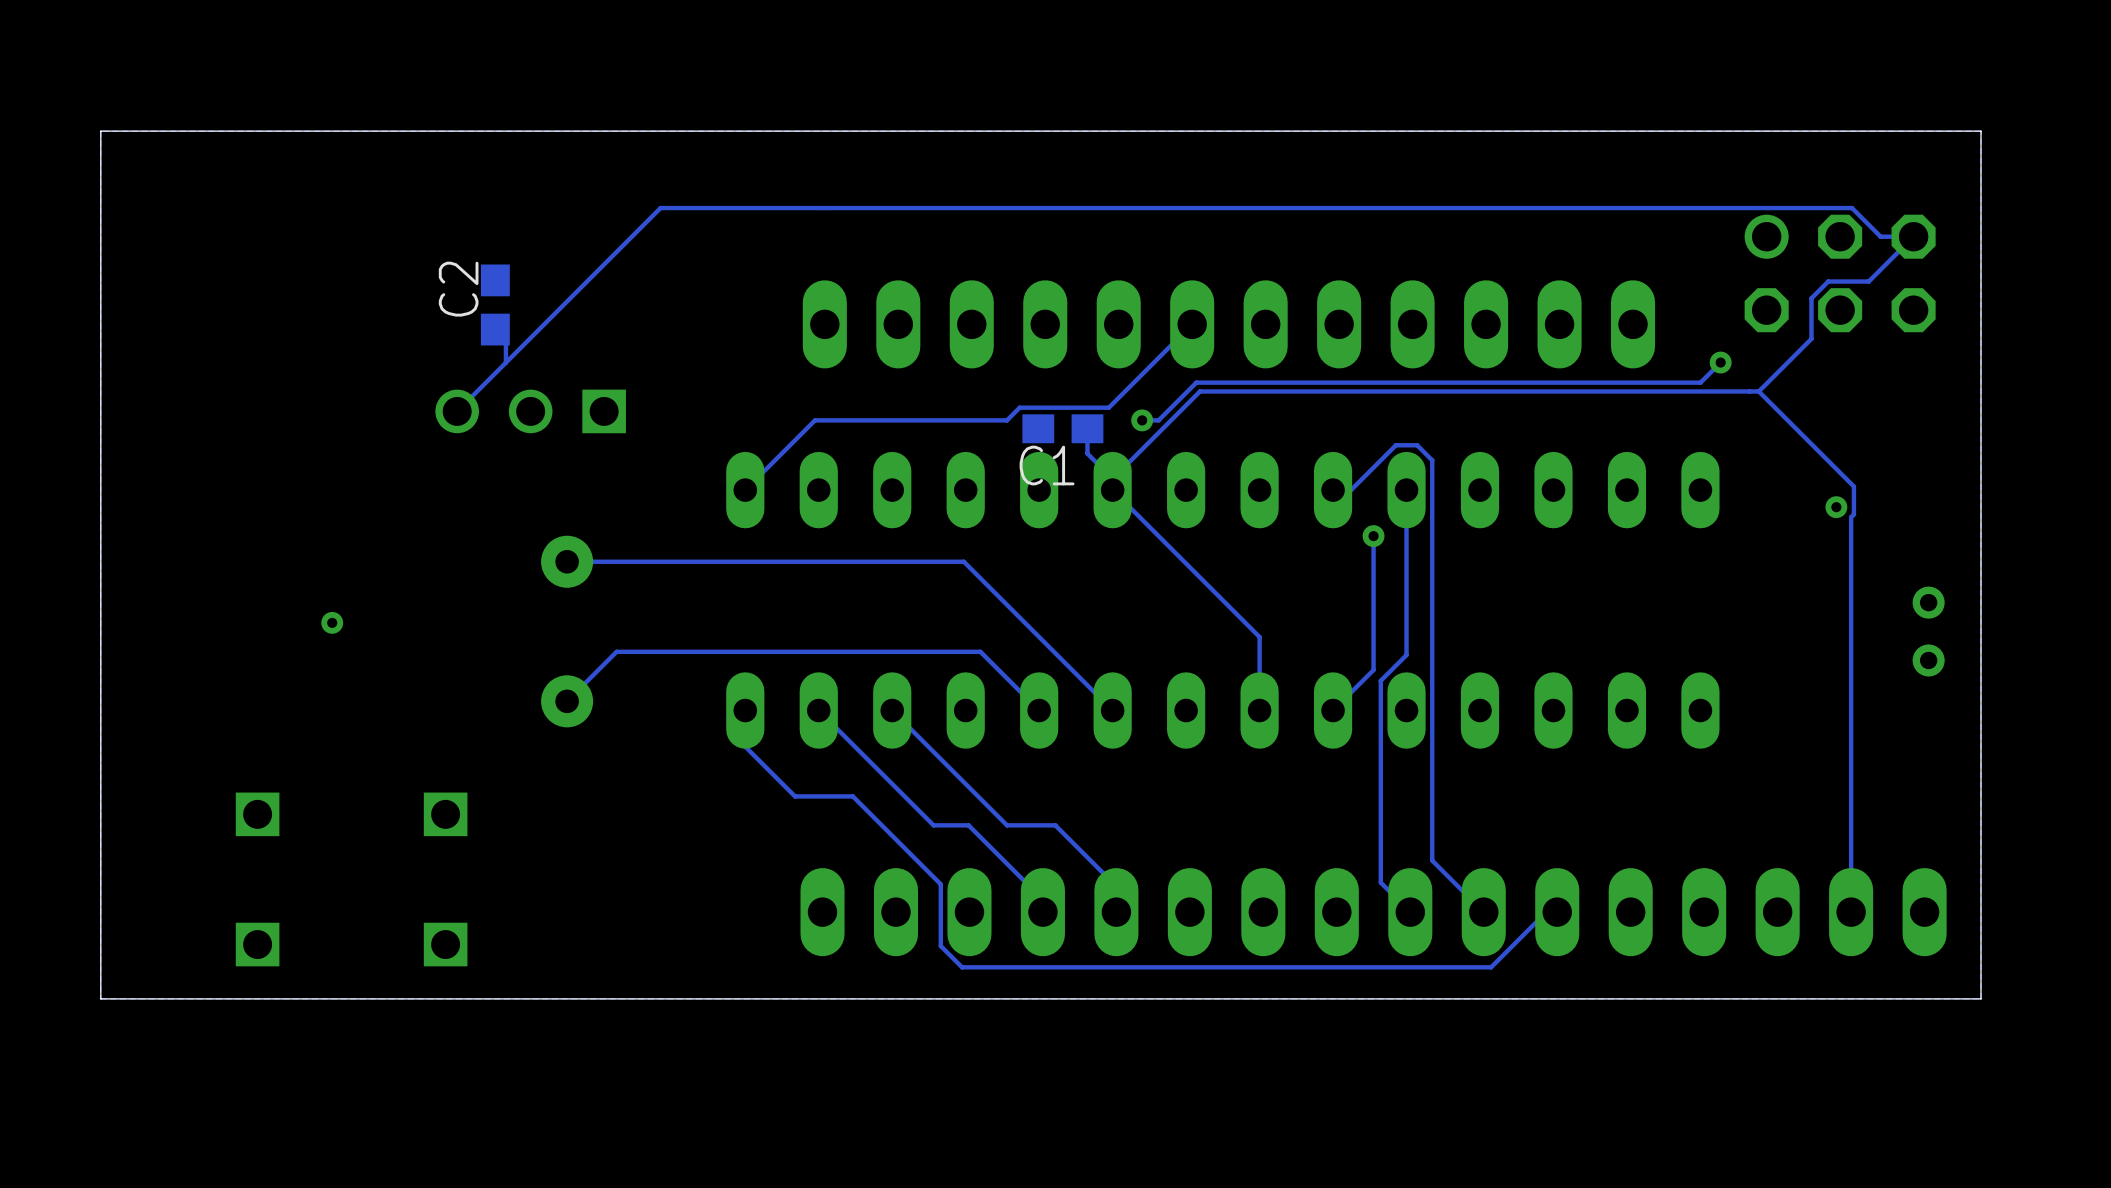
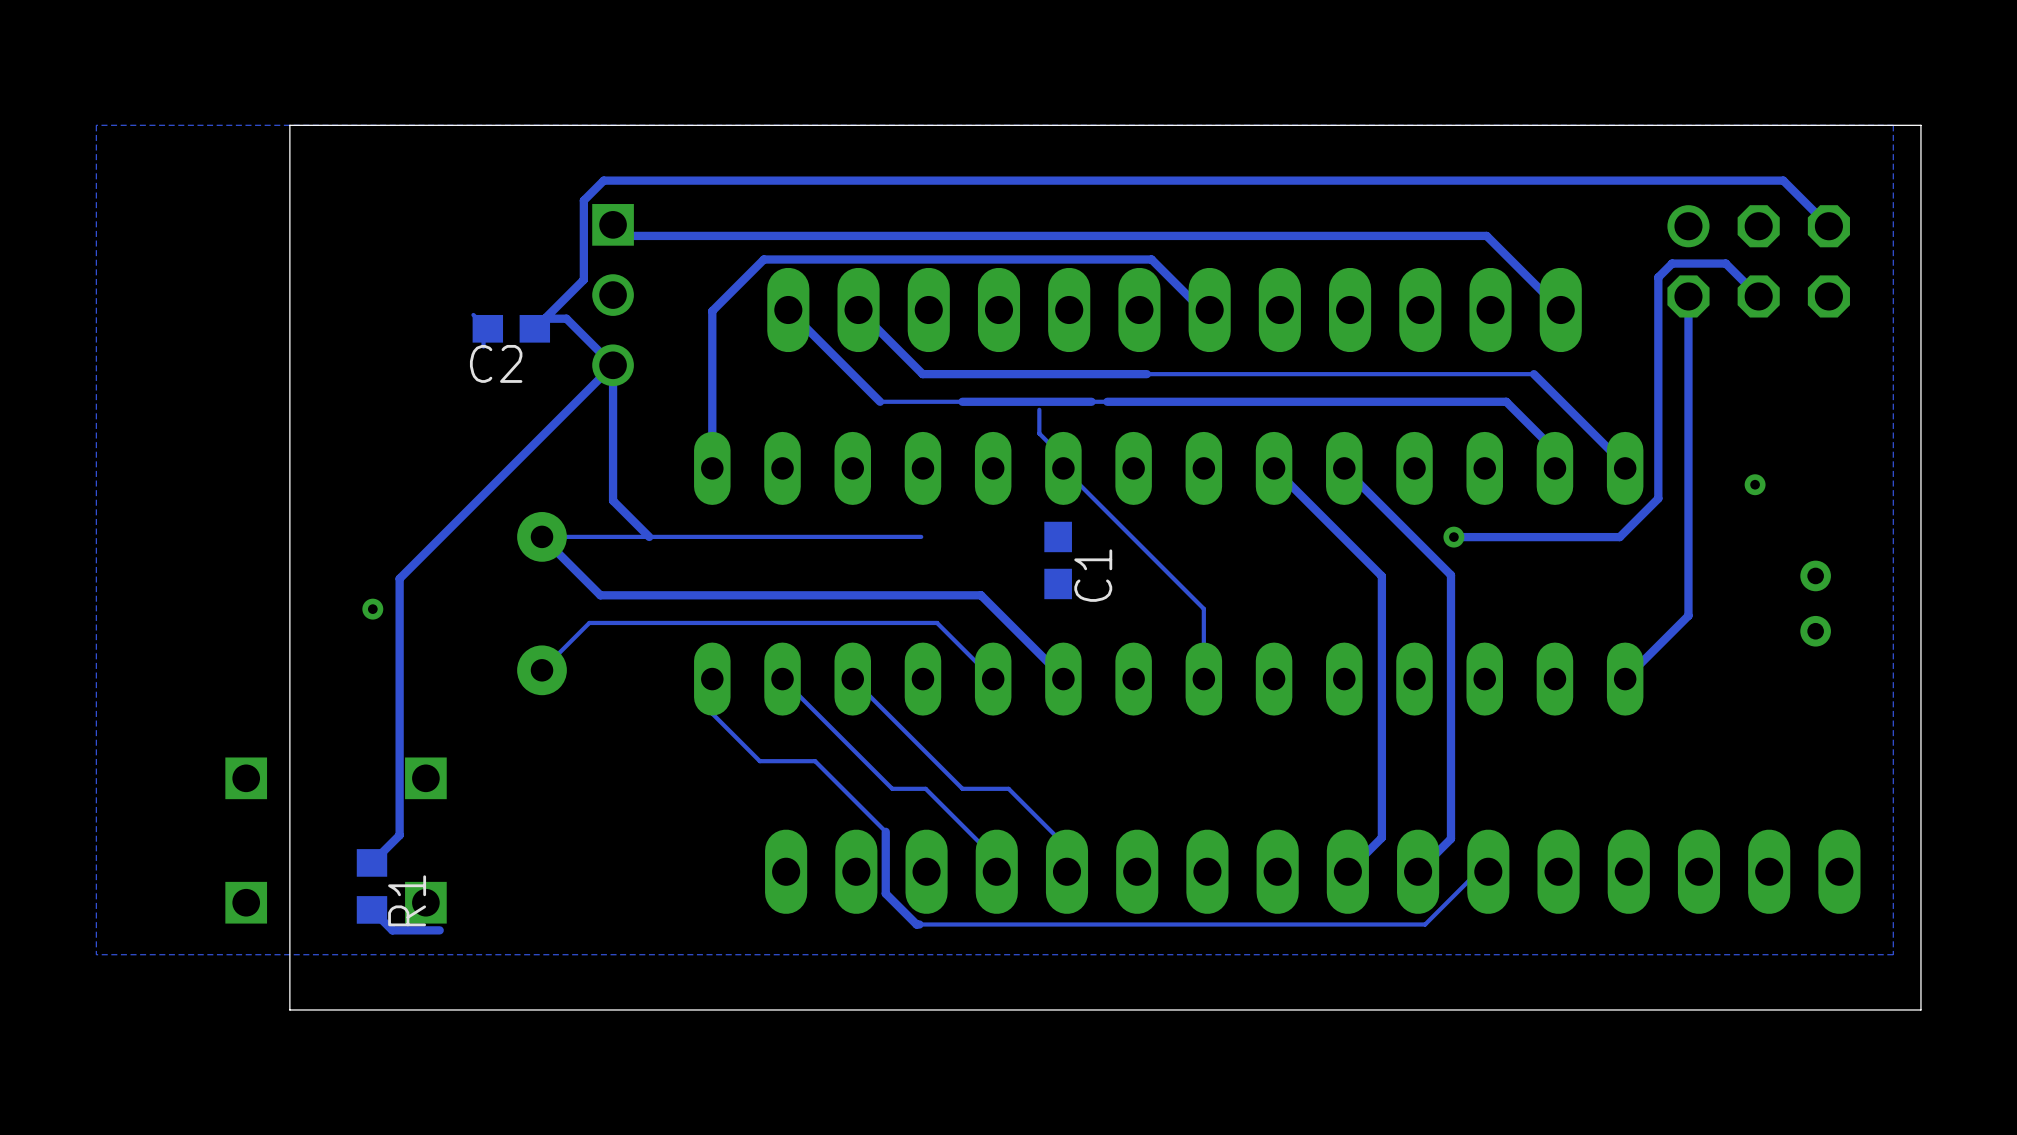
board edge: (1981, 131) (1981, 998) (100, 998) (100, 131) (303, 131) -> (1893, 125) (1920, 125) (1920, 1009) (289, 1009) (289, 125)
track: none -> (613, 224) (624, 235) (1486, 235) (1560, 310)
track: none -> (1828, 226) (1783, 180) (603, 180) (583, 200) (583, 279) (534, 328)
C2 name position: C2 (458, 289) -> C2 (496, 363)
C2 rotation: 0° (495, 304) -> 90° clockwise (511, 328)
C2 position: (495, 304) -> (511, 328)
track: none -> (1688, 296) (1688, 615) (1625, 679)
track: none -> (1758, 296) (1725, 263) (1672, 263) (1658, 277) (1658, 498) (1619, 537) (1453, 537)
track: (1192, 324) (1108, 407) (1019, 407) (1006, 420) -> (1091, 401) (962, 401)
track: none -> (1209, 310) (1202, 310) (1151, 259) (763, 259) (712, 311) (712, 468)
track: none -> (544, 318) (566, 318) (613, 365)
track: (1720, 362) (1700, 382) (1196, 382) (1158, 420) -> (1554, 468) (1554, 450) (1506, 401) (1107, 401)
via: (1720, 362) -> none
track: none -> (613, 365) (613, 500) (649, 536)
track: none -> (613, 365) (399, 578) (399, 835) (371, 862)
track: (1200, 391) (1112, 478) -> (1146, 374) (922, 374) (858, 310)
track: (1758, 391) (1604, 391) -> (1625, 468) (1625, 465) (1533, 374)
track: (1758, 391) (1811, 338) (1811, 298) (1828, 281) (1868, 281) (1913, 236) (1880, 236) (1852, 208) (660, 208) (457, 411) -> none
track: (1758, 391) (1853, 486) (1853, 514) (1851, 517) (1851, 912) -> none
part rotation: 0° (530, 411) -> 90° counterclockwise (613, 295)
part position: (530, 411) -> (613, 295)
track: (920, 420) (815, 420) (745, 490) -> (880, 401) (788, 310)
via: (1142, 420) -> none
C1 rotation: 0° (1062, 428) -> 90° clockwise (1058, 560)
C1 position: (1062, 428) -> (1058, 560)
C1 name position: C1 (1047, 465) -> C1 (1093, 575)
track: (1333, 490) (1351, 490) (1395, 445) (1417, 445) (1432, 460) (1432, 860) (1483, 912) -> (1274, 468) (1381, 576) (1381, 837) (1347, 871)
track: (1406, 490) (1406, 655) (1380, 680) (1380, 882) (1410, 912) -> (1344, 468) (1450, 575) (1450, 838) (1418, 871)
track: (1373, 536) (1373, 670) (1333, 710) -> none
via: (1373, 536) -> none
track: (963, 561) (1112, 710) -> (542, 536) (600, 595) (981, 595) (1063, 679)
via: none -> (1453, 537)
via position: (332, 622) -> (372, 609)
part position: (1928, 631) -> (1815, 603)
track: (926, 870) (940, 884) (940, 946) (962, 967) -> (885, 831) (885, 893) (916, 924) (919, 924)
R1: none -> (371, 886)
track: none -> (371, 909) (392, 930) (439, 930)

